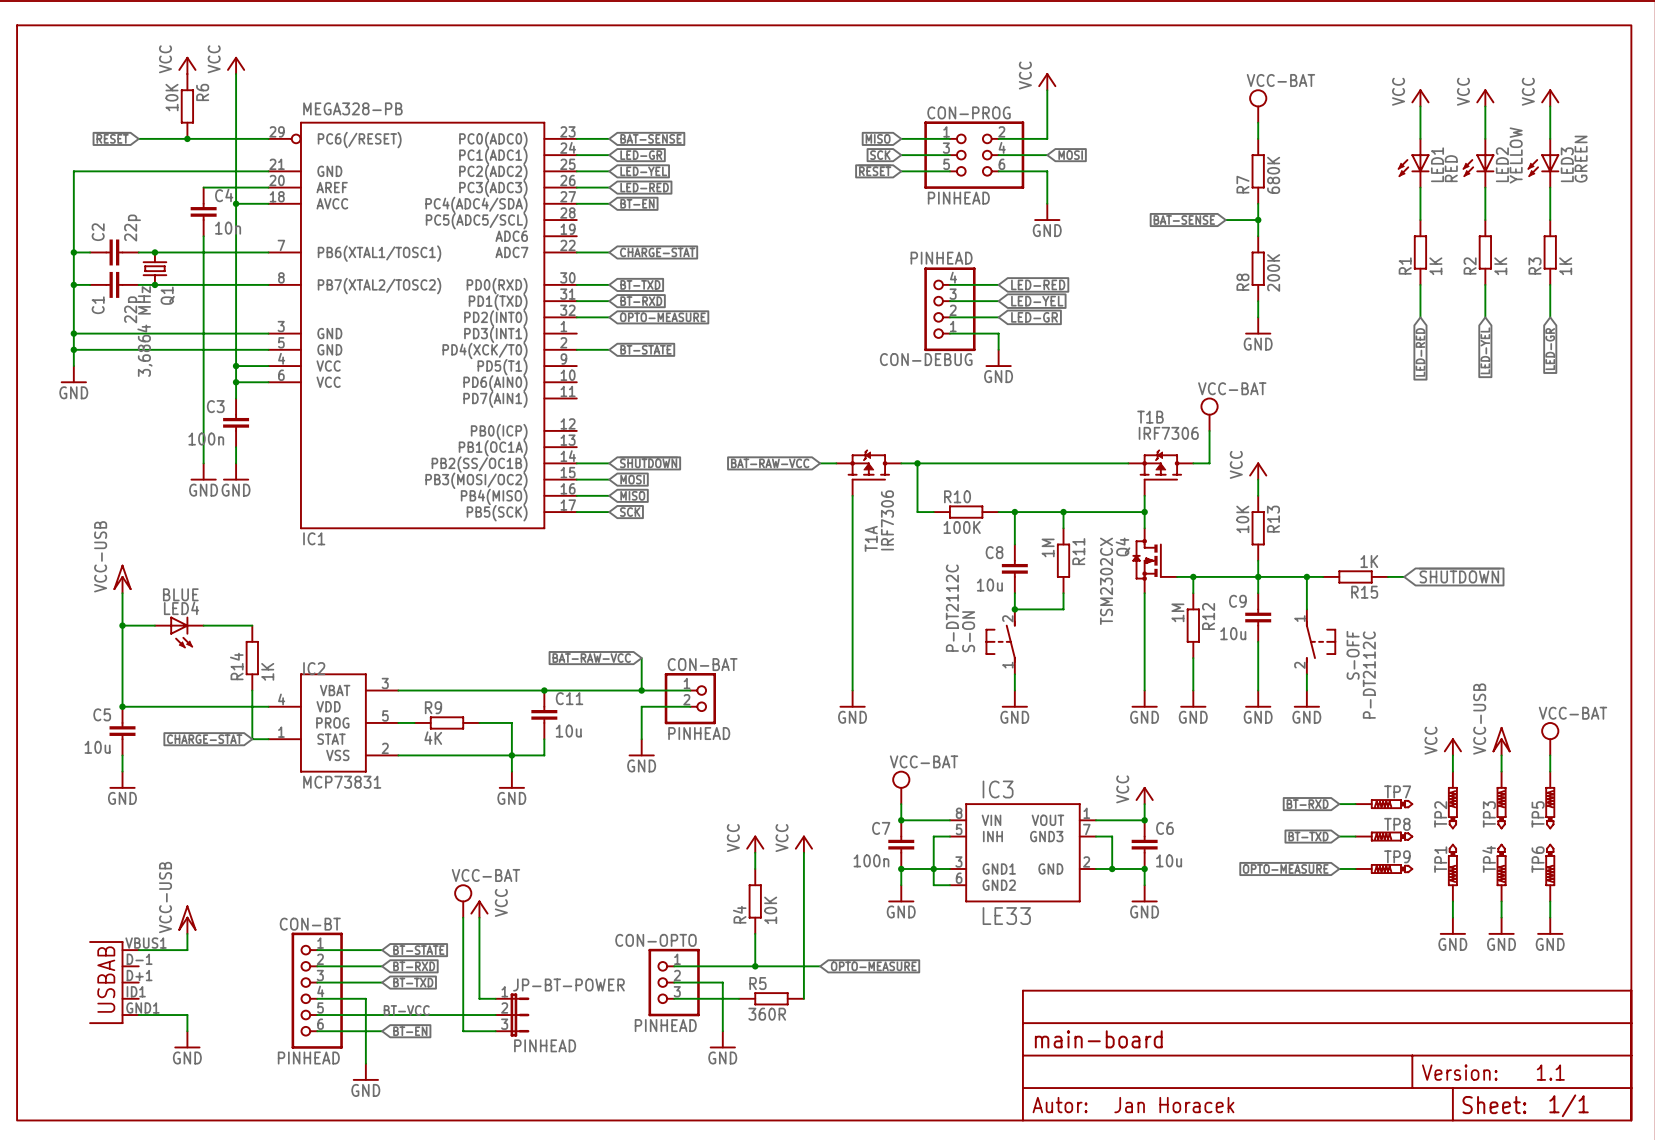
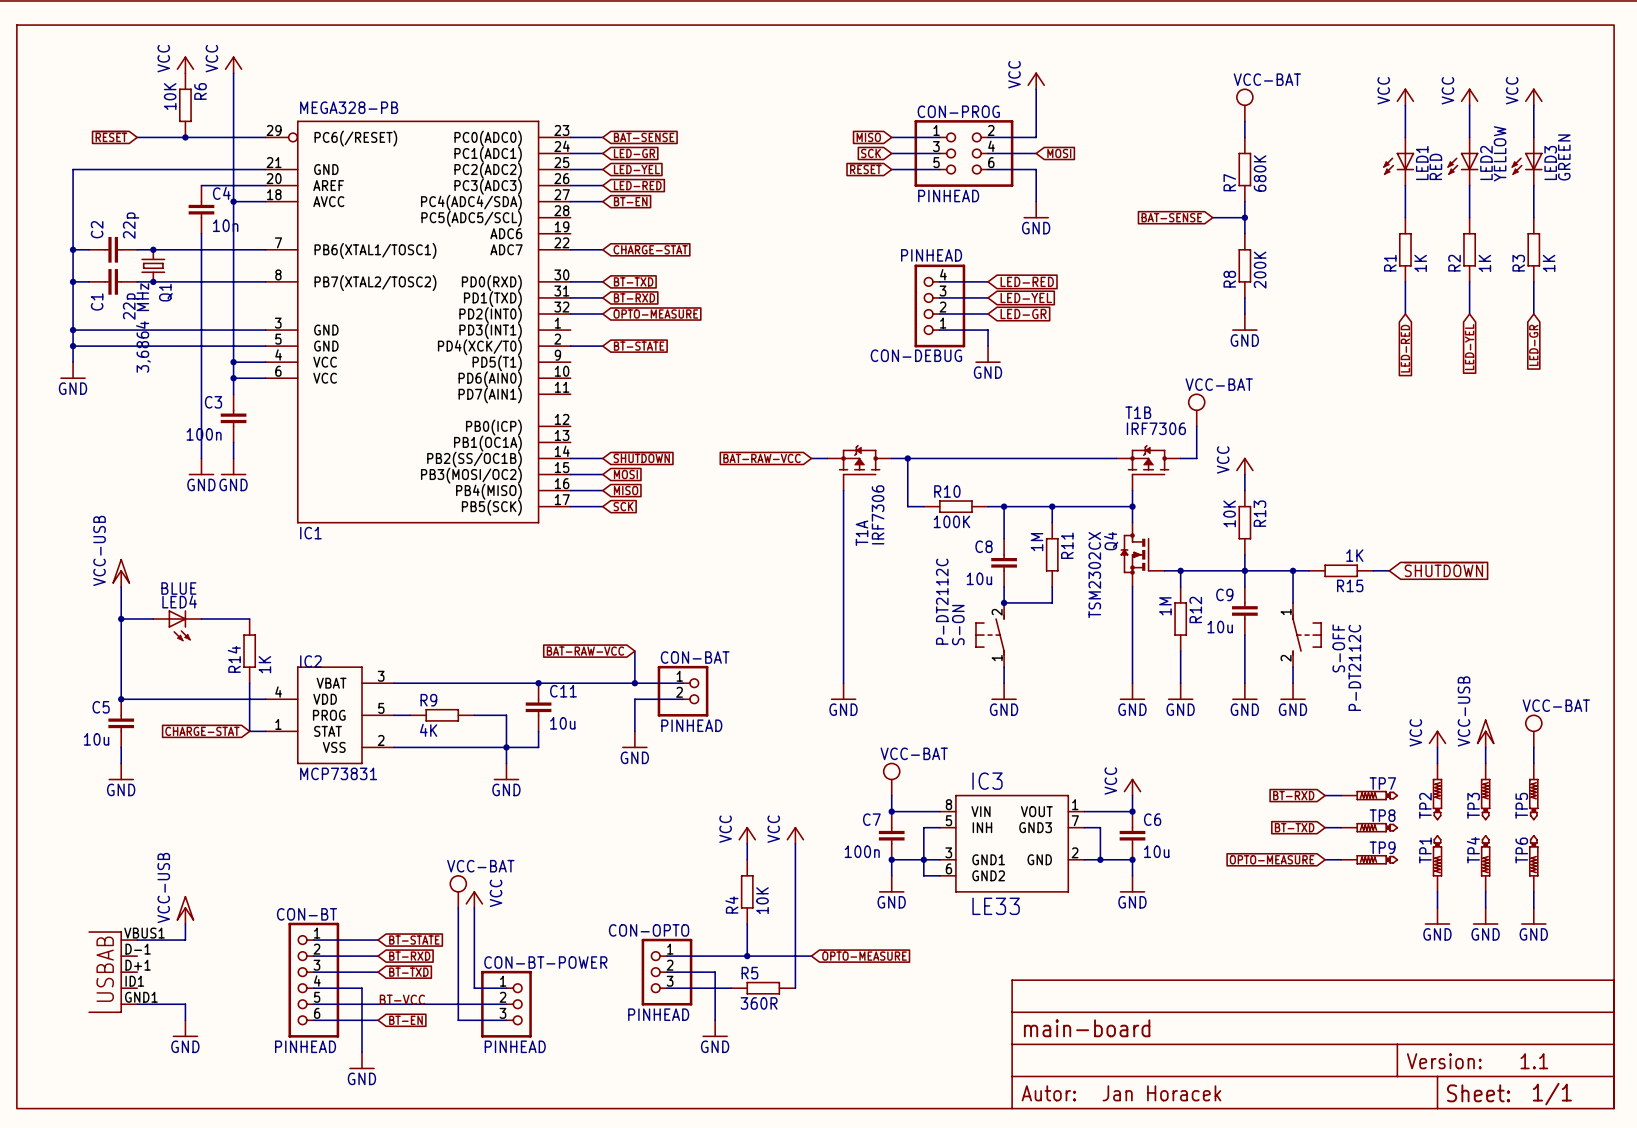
CON-BT-POWER: none -> PINHEAD (506, 1004)
JP-BT-POWER: PINHEAD (512, 1015) -> none

